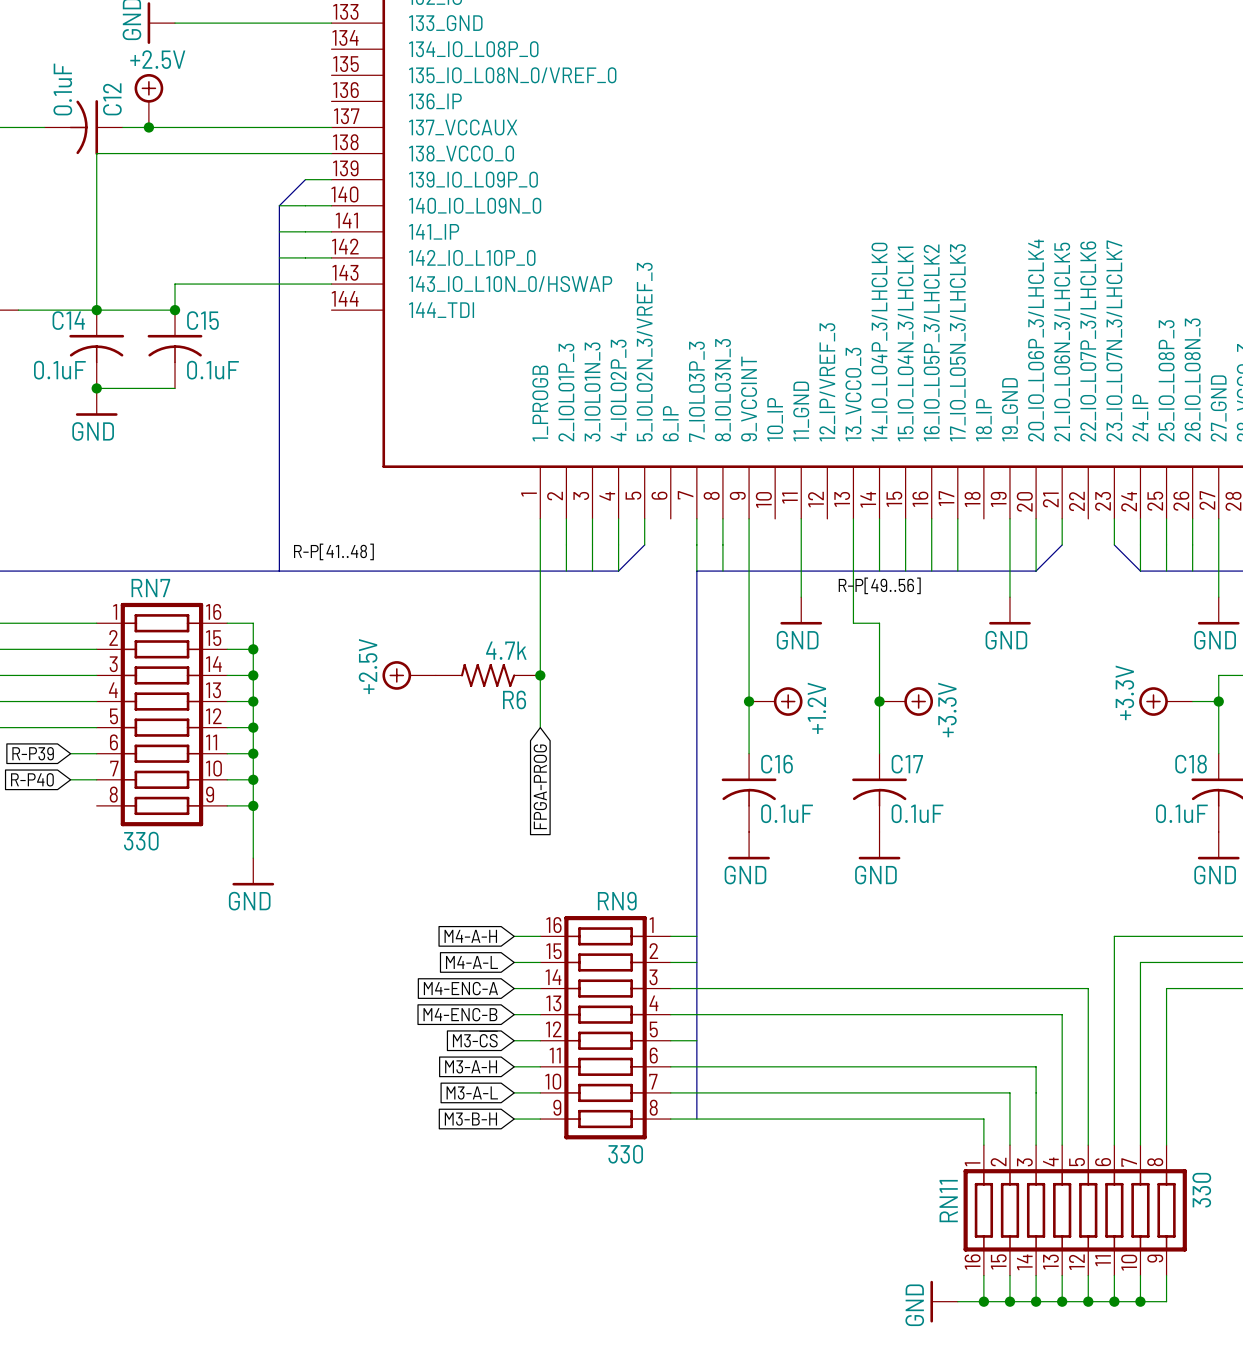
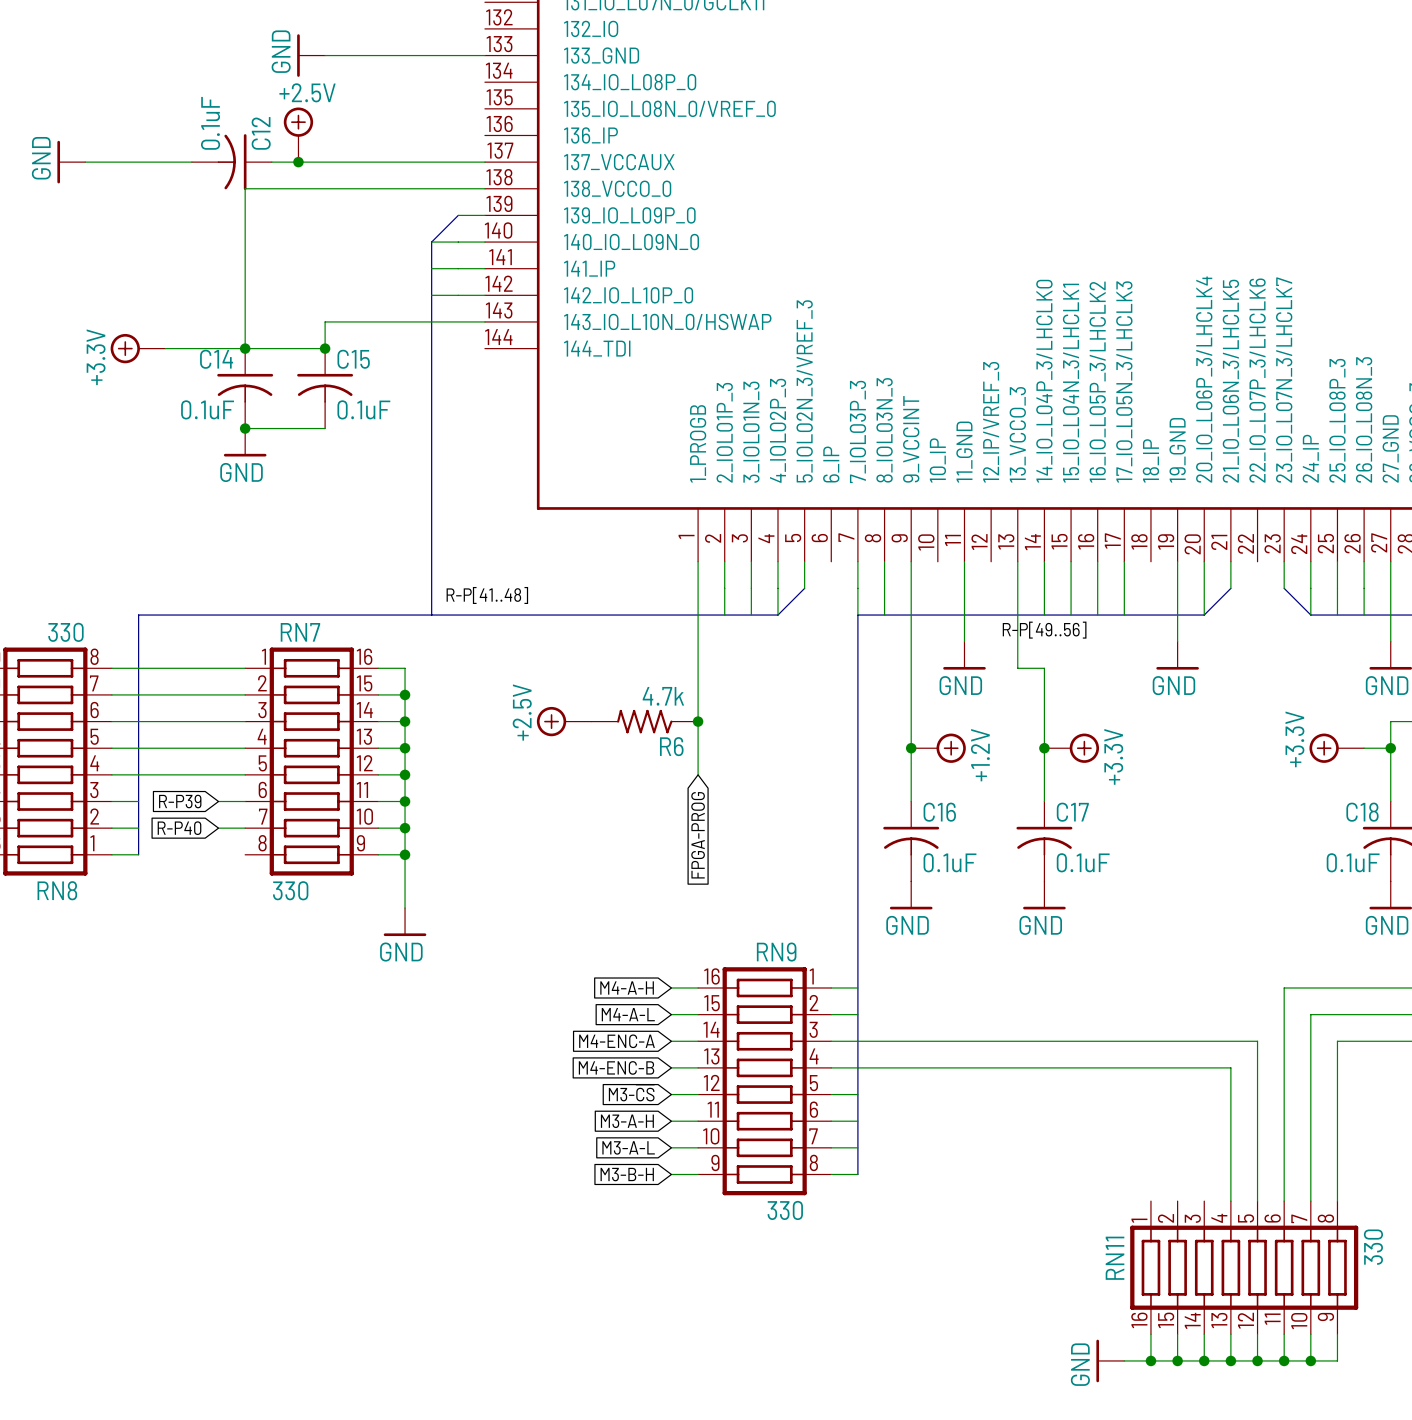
wire: (696, 1066) (1036, 1066) (1036, 1145) -> none
wire: (696, 1092) (1009, 1092) (1009, 1145) -> none
wire: (696, 1119) (983, 1119) (983, 1145) -> none

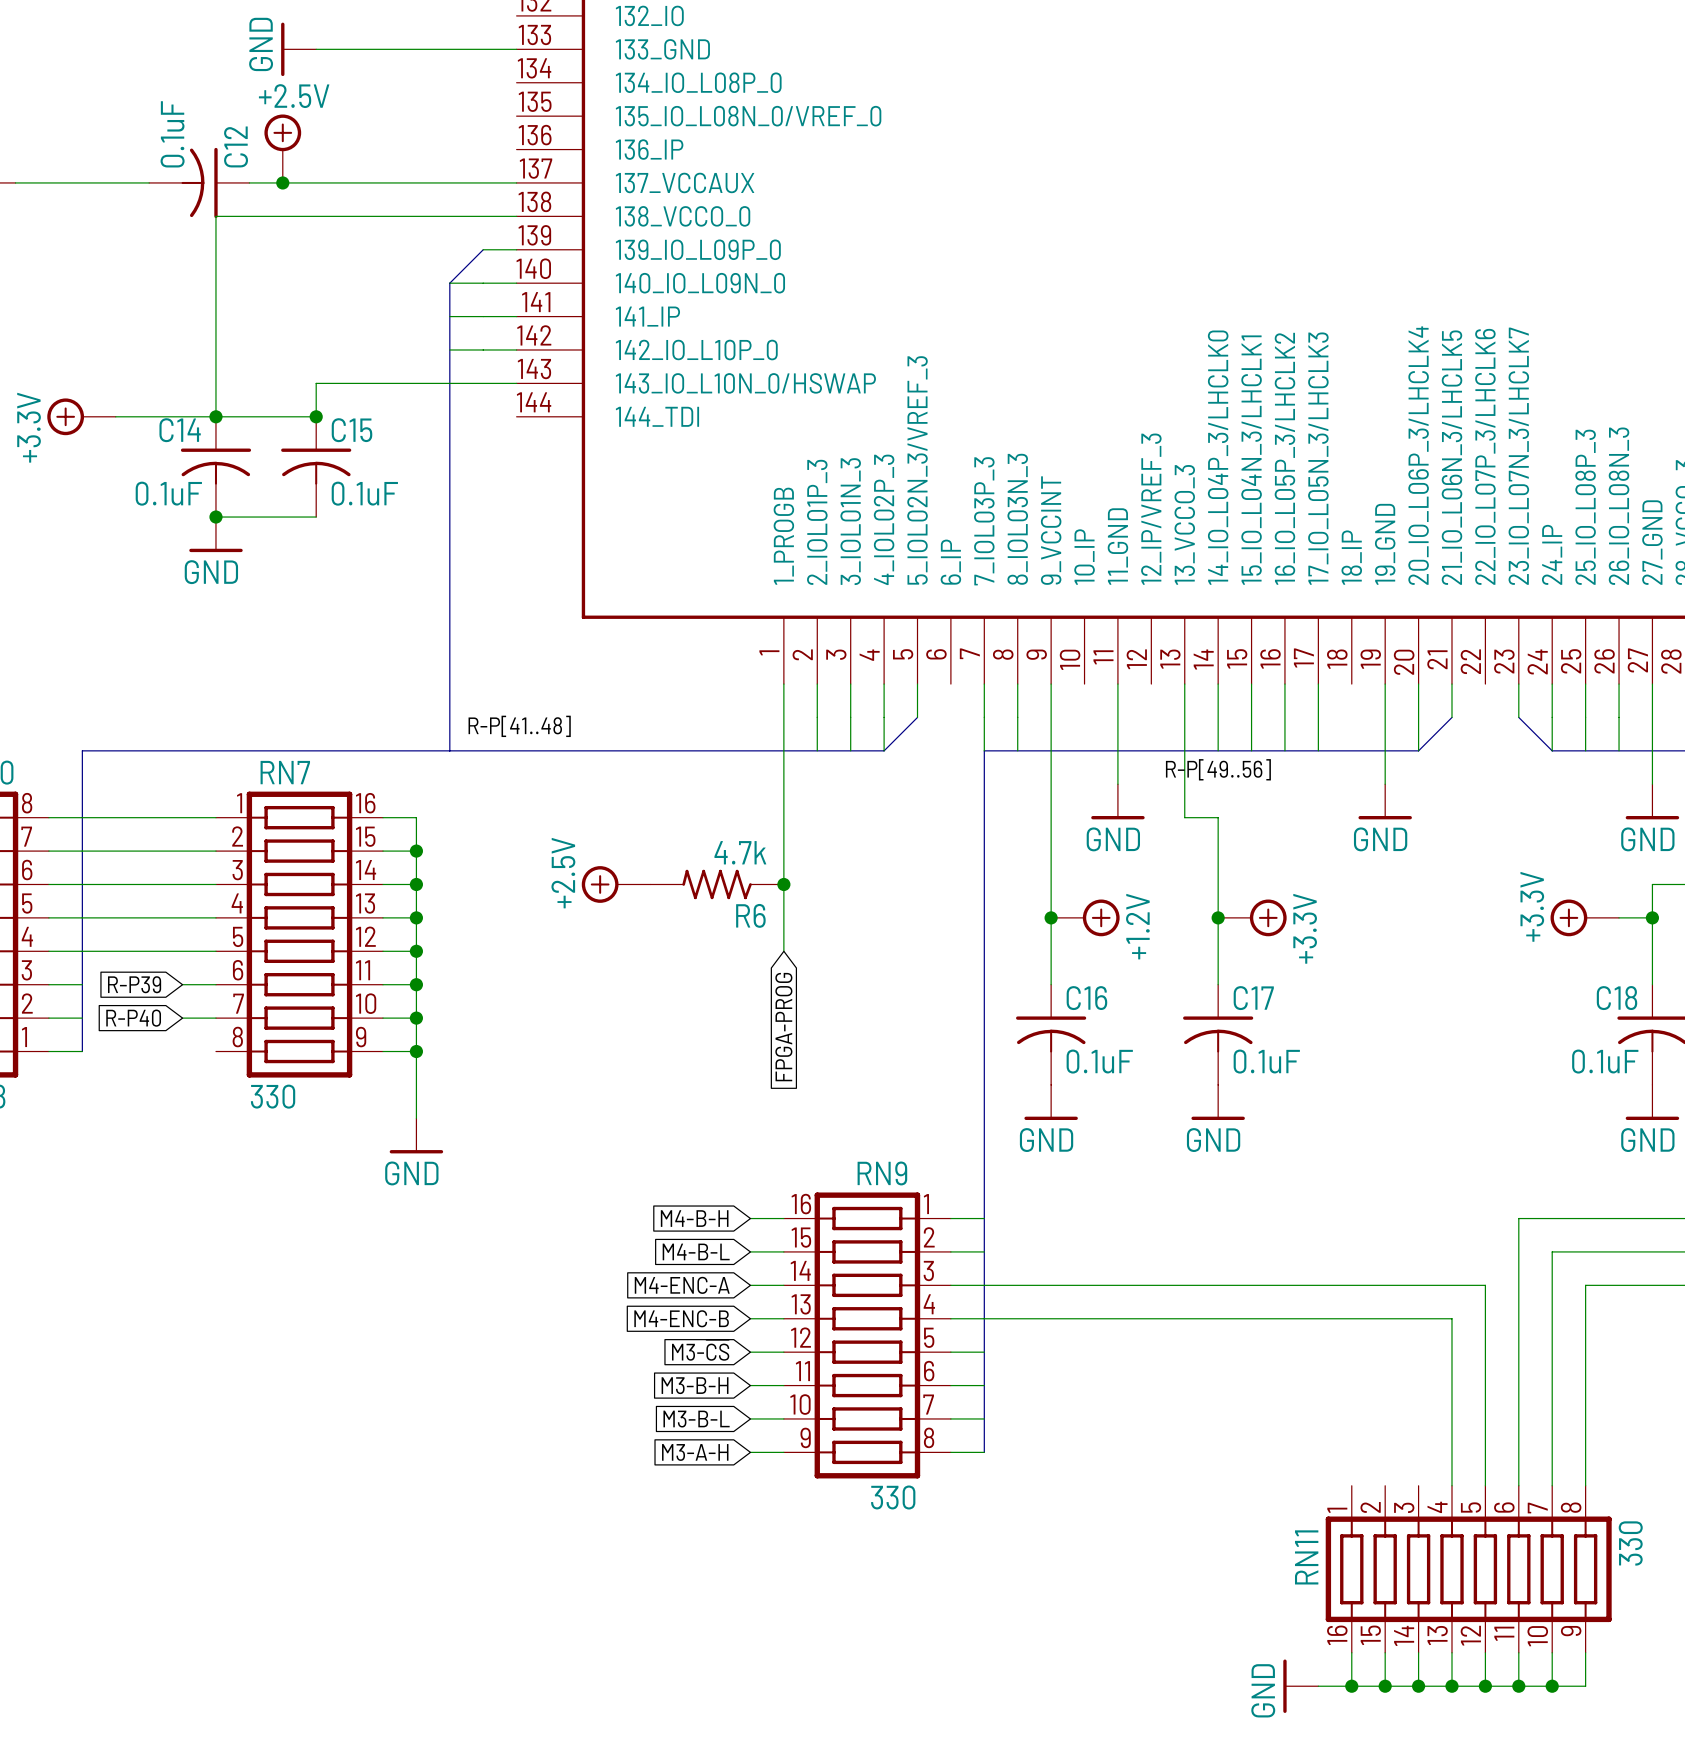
global label: M4-A-H (627, 988) -> M4-B-H (694, 1218)
global label: M4-A-L (628, 1014) -> M4-B-L (696, 1251)
global label: M3-A-H (627, 1121) -> M3-B-H (695, 1385)
global label: M3-A-L (628, 1147) -> M3-B-L (696, 1419)
global label: M3-B-H (627, 1174) -> M3-A-H (695, 1452)

